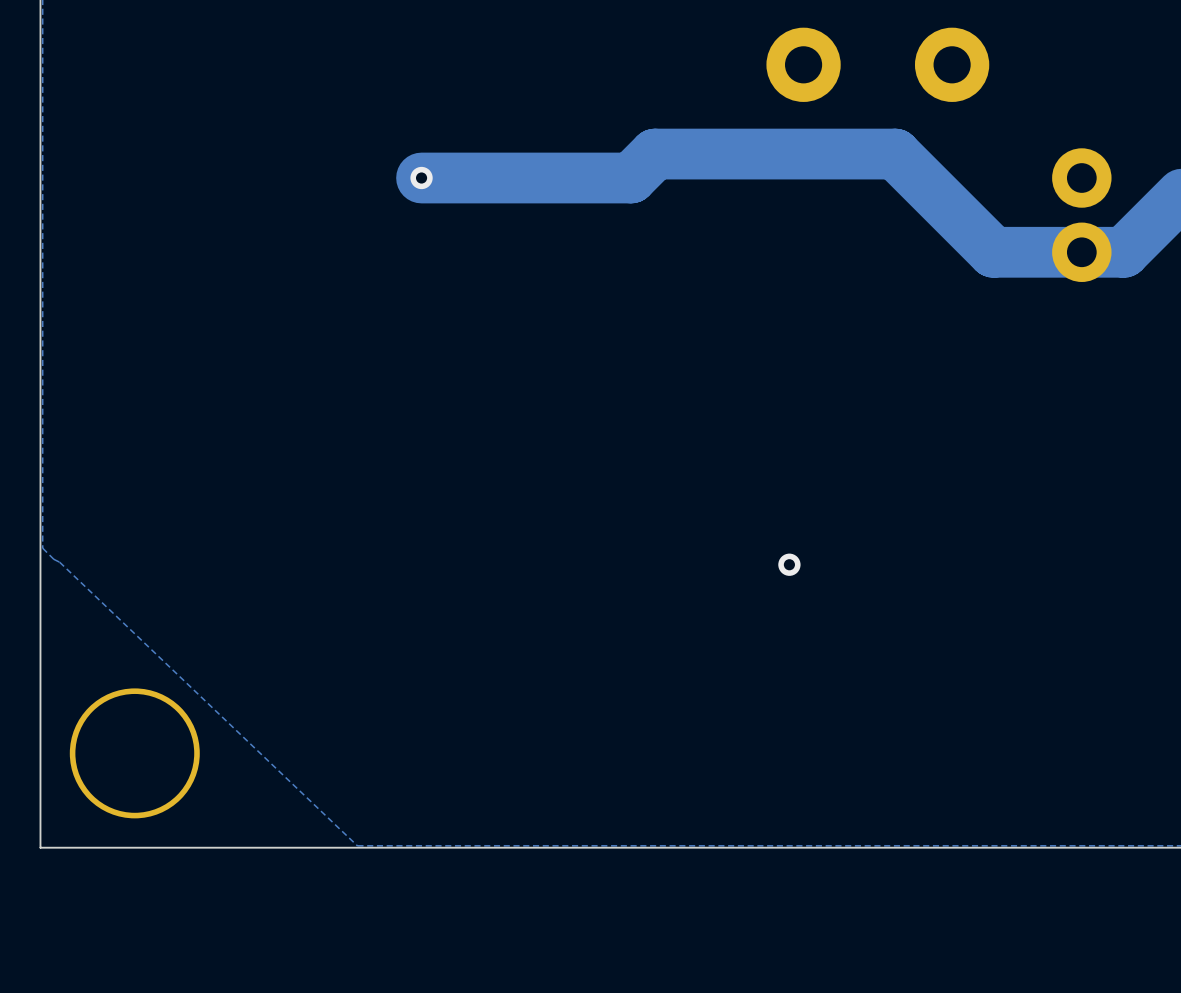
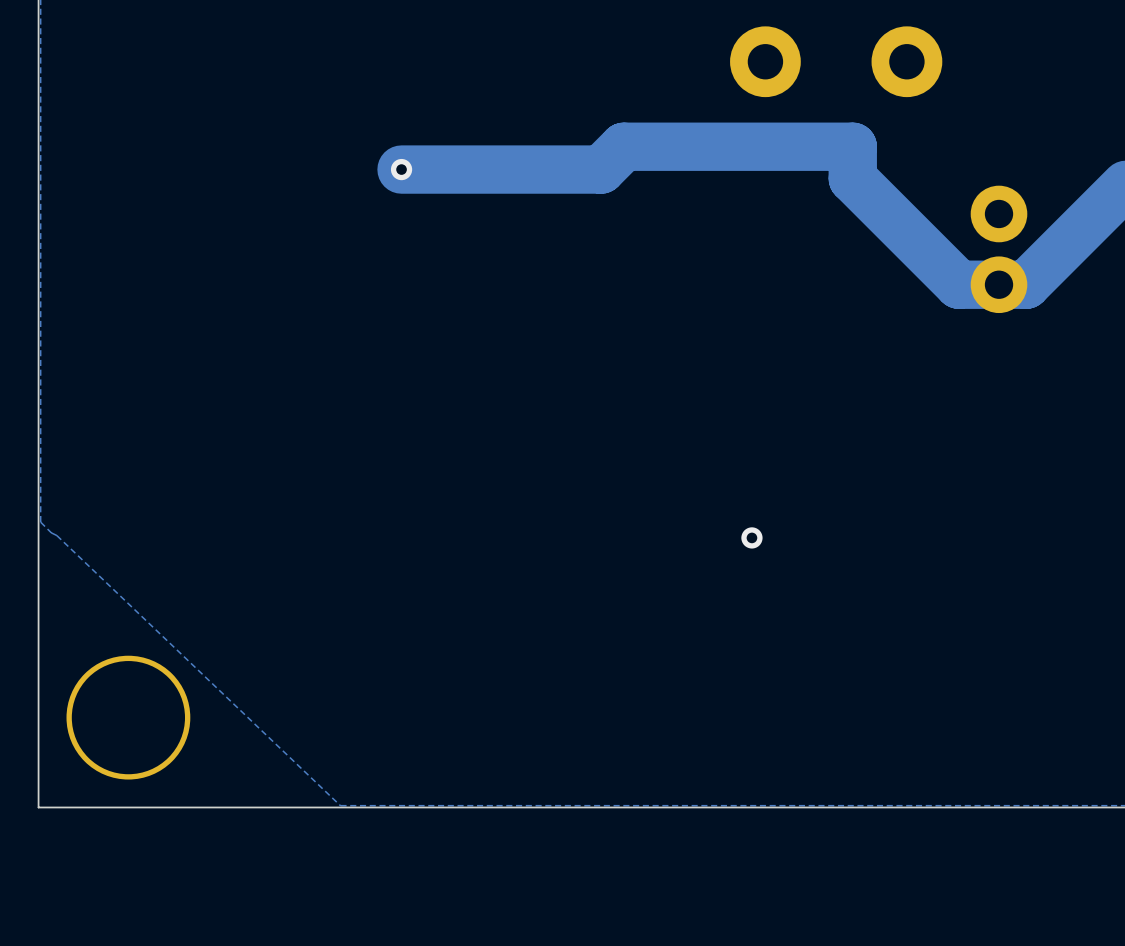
track: (895, 154) (993, 252) (1123, 252) -> (852, 146) (852, 178) (958, 284) (1026, 284) (1070, 240)
part position: (1081, 215) -> (999, 249)

